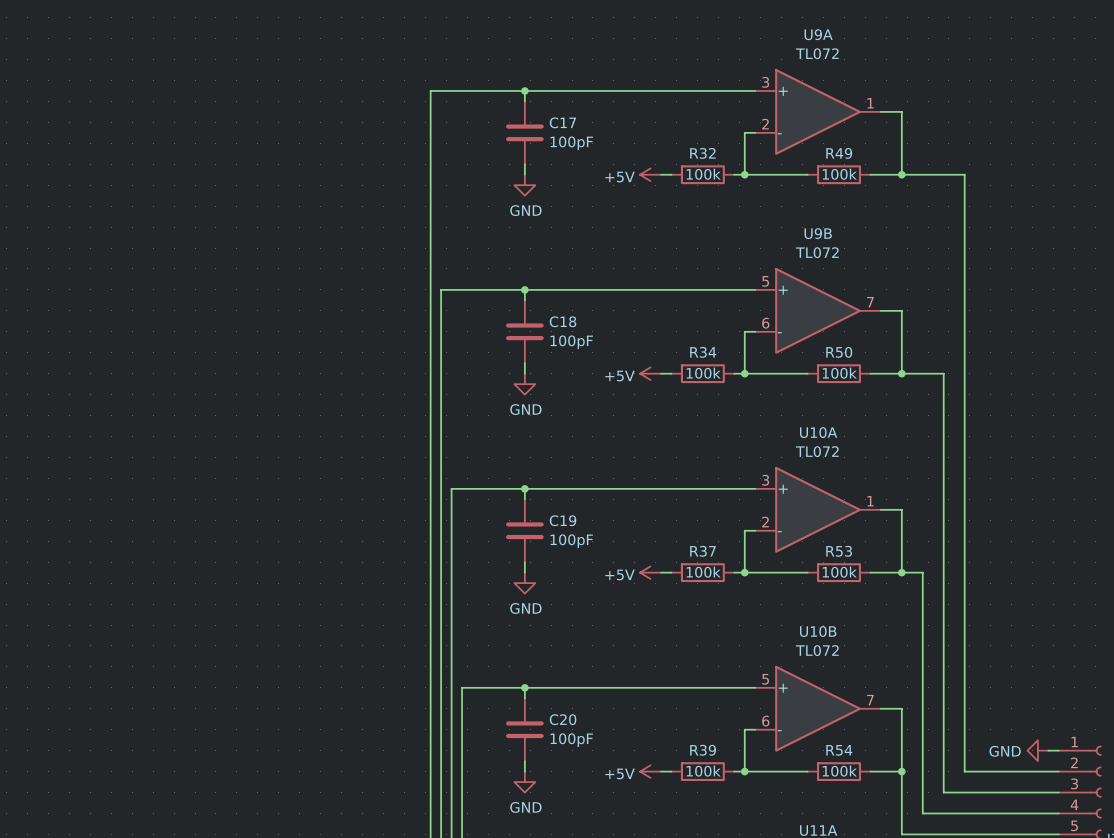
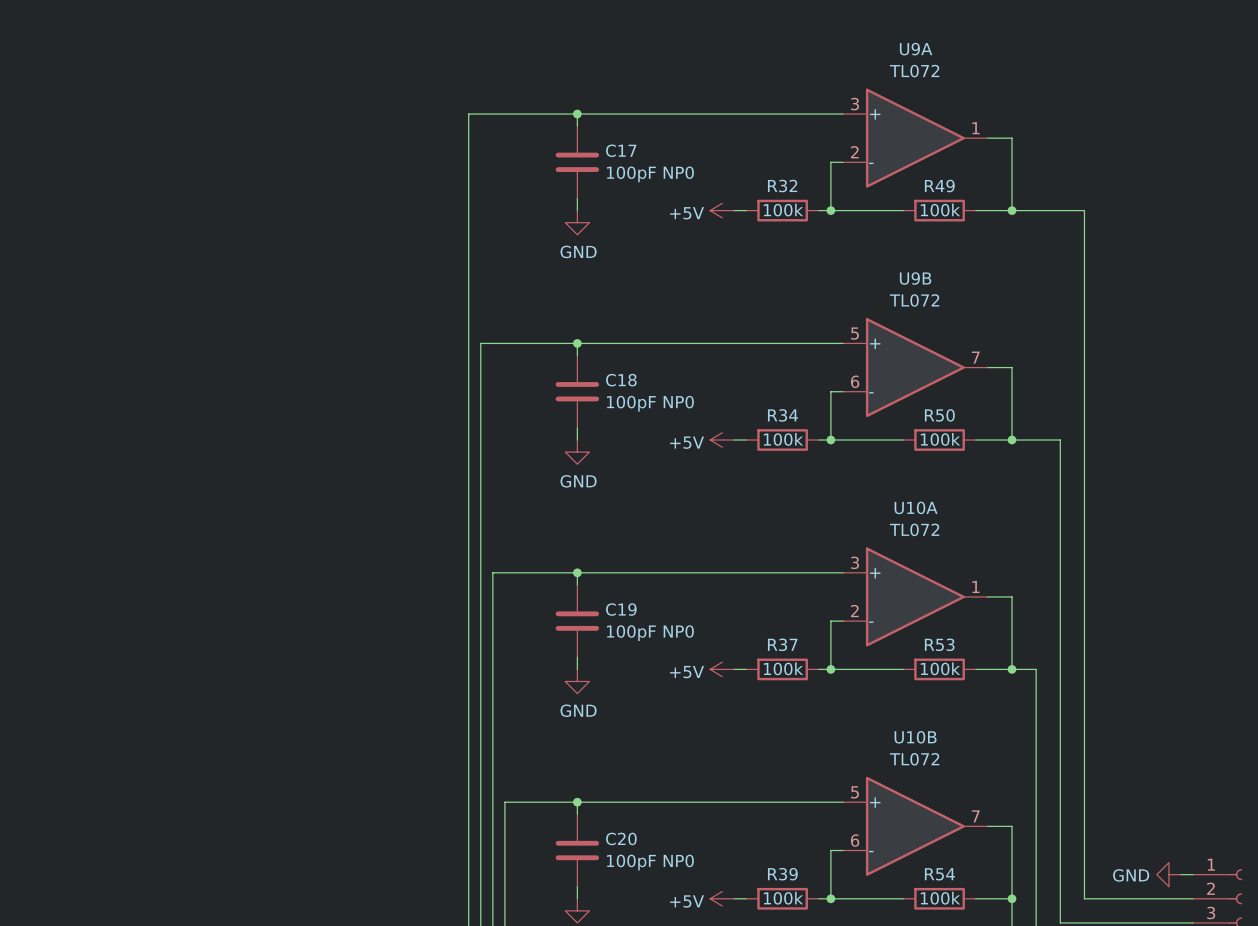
C17 value: 100pF (571, 143) -> 100pF NP0 (650, 174)
C18 value: 100pF (571, 342) -> 100pF NP0 (650, 403)
C19 value: 100pF (571, 541) -> 100pF NP0 (650, 633)
C20 value: 100pF (571, 740) -> 100pF NP0 (650, 862)

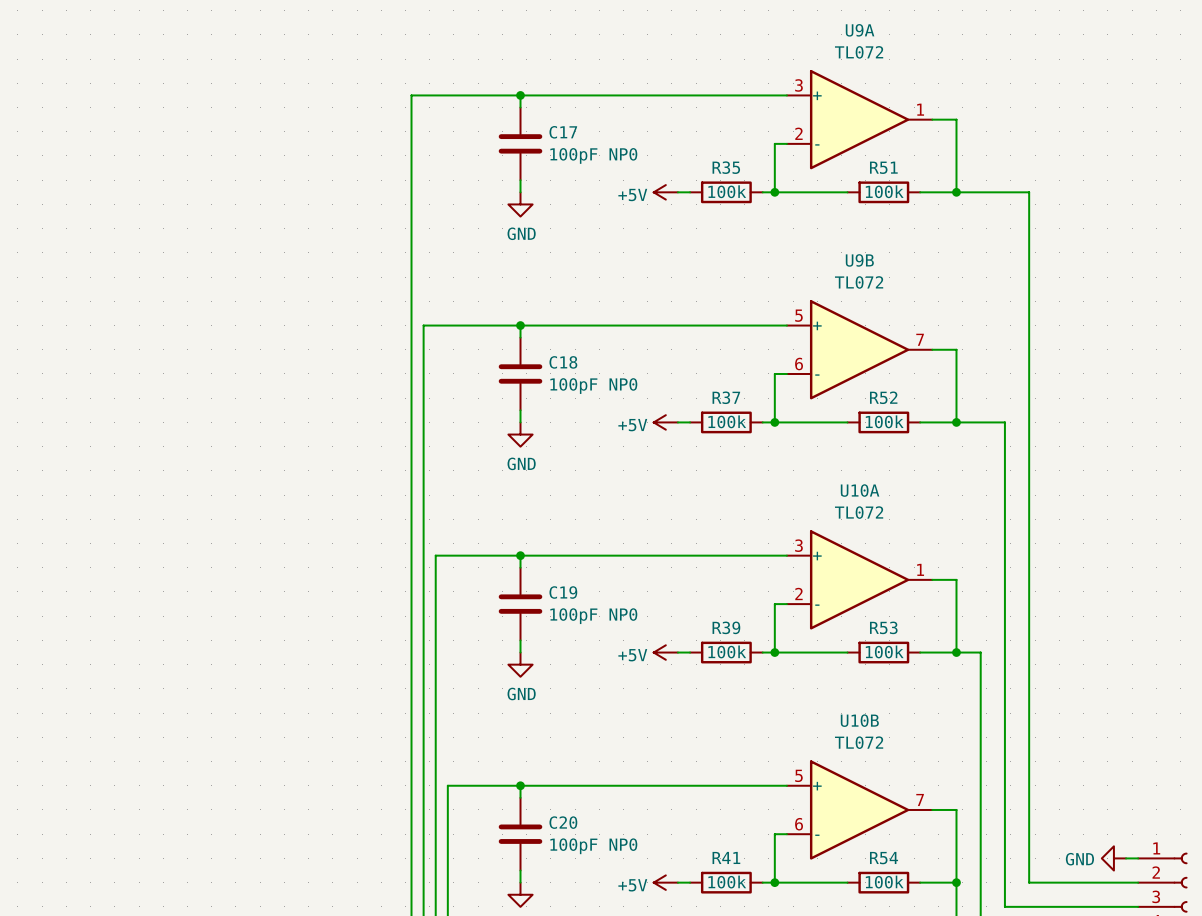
R32 name: R32 (782, 186) -> R35 (726, 167)
R49 name: R49 (939, 186) -> R51 (883, 167)
R34 name: R34 (782, 415) -> R37 (726, 397)
R50 name: R50 (939, 415) -> R52 (883, 397)
R37 name: R37 (782, 644) -> R39 (726, 627)
R39 name: R39 (782, 874) -> R41 (726, 857)

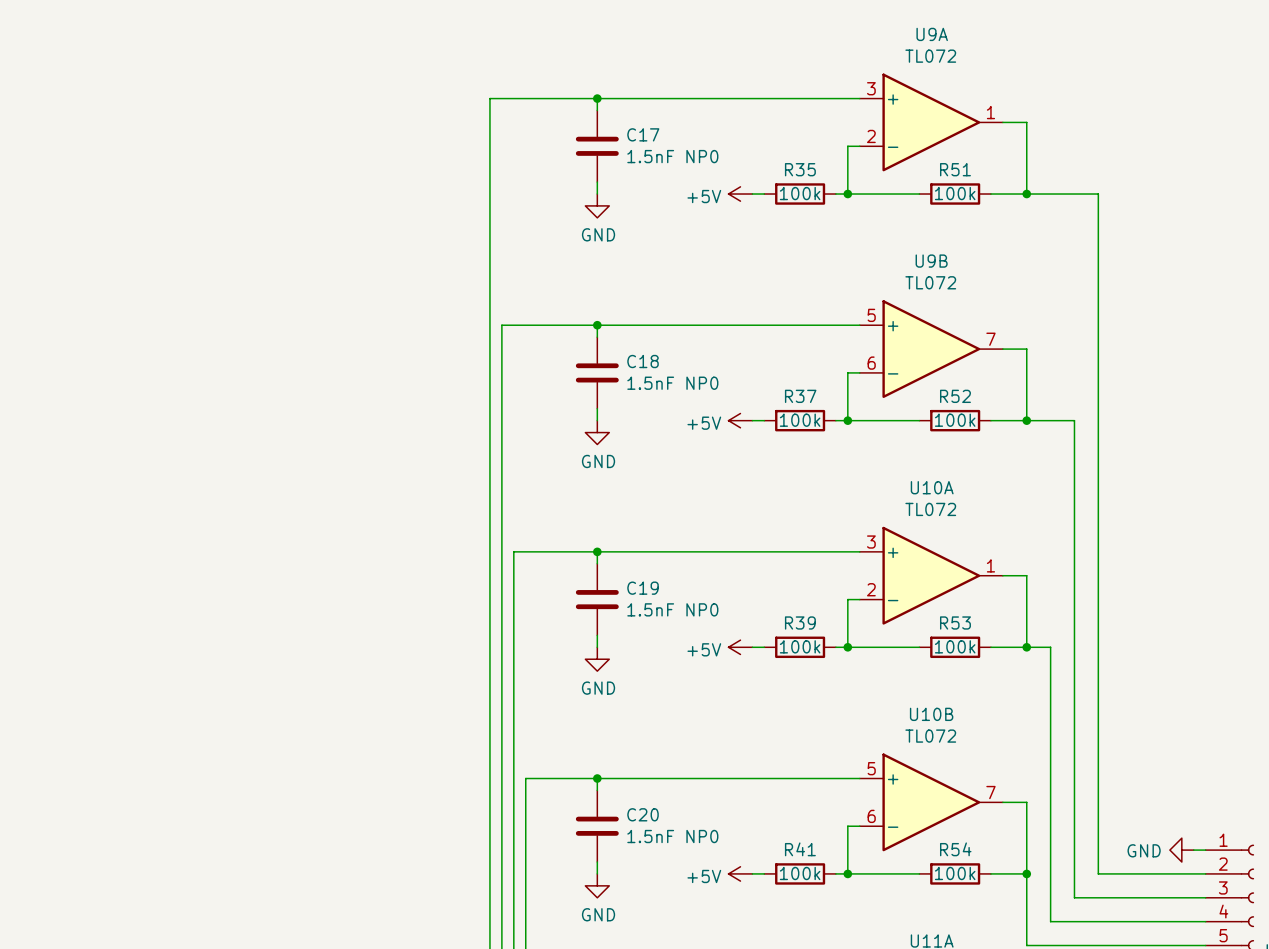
C17 value: 100pF NP0 (593, 155) -> 1.5nF NP0 (672, 156)
C18 value: 100pF NP0 (593, 386) -> 1.5nF NP0 (672, 383)
C19 value: 100pF NP0 (593, 616) -> 1.5nF NP0 (672, 609)
C20 value: 100pF NP0 (593, 846) -> 1.5nF NP0 (672, 836)

